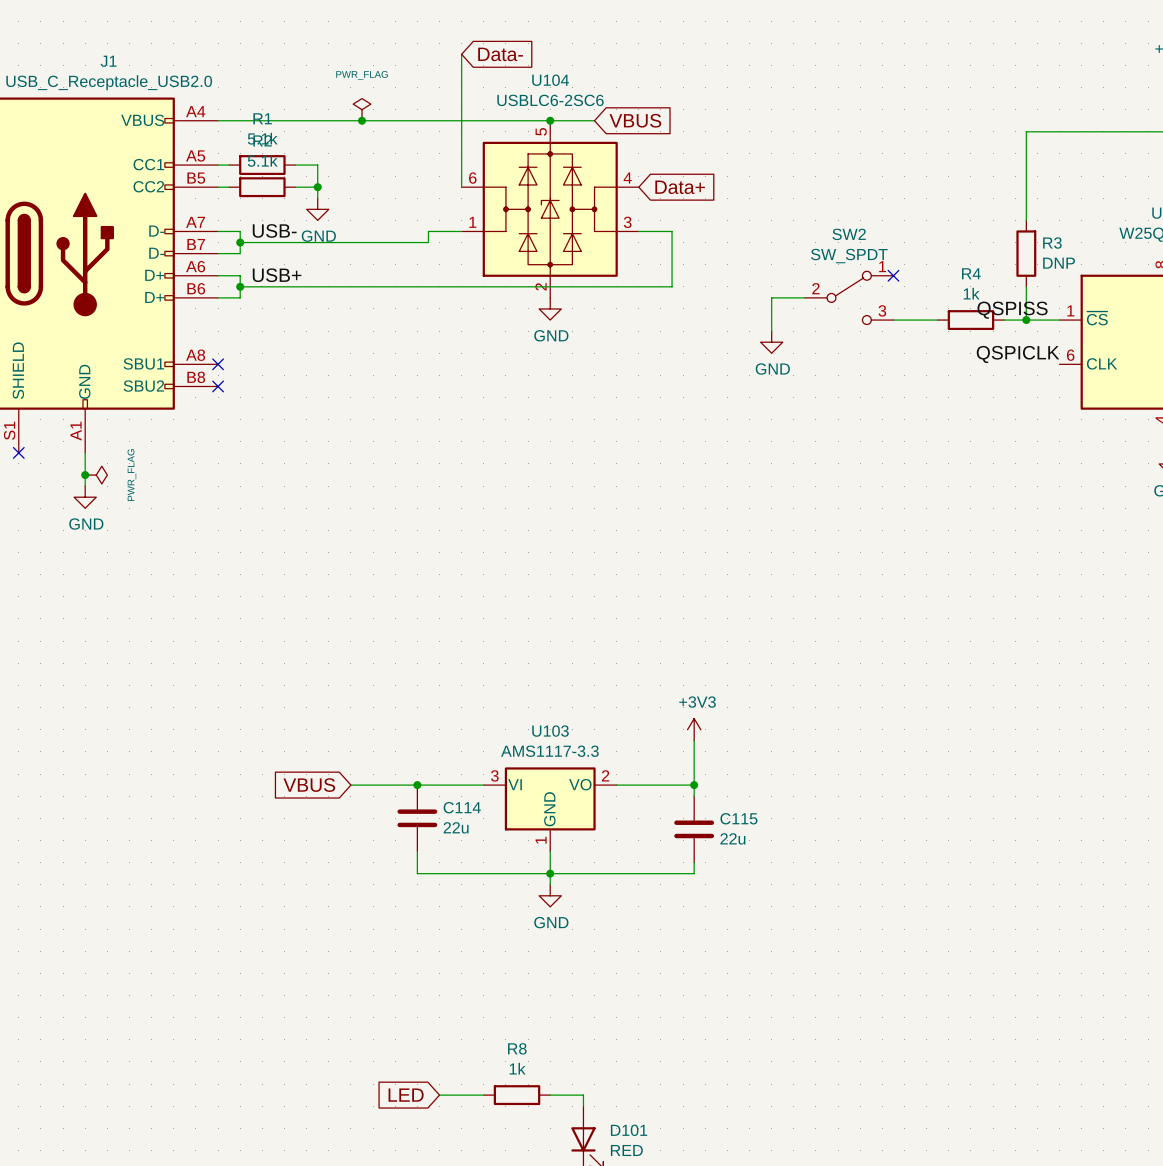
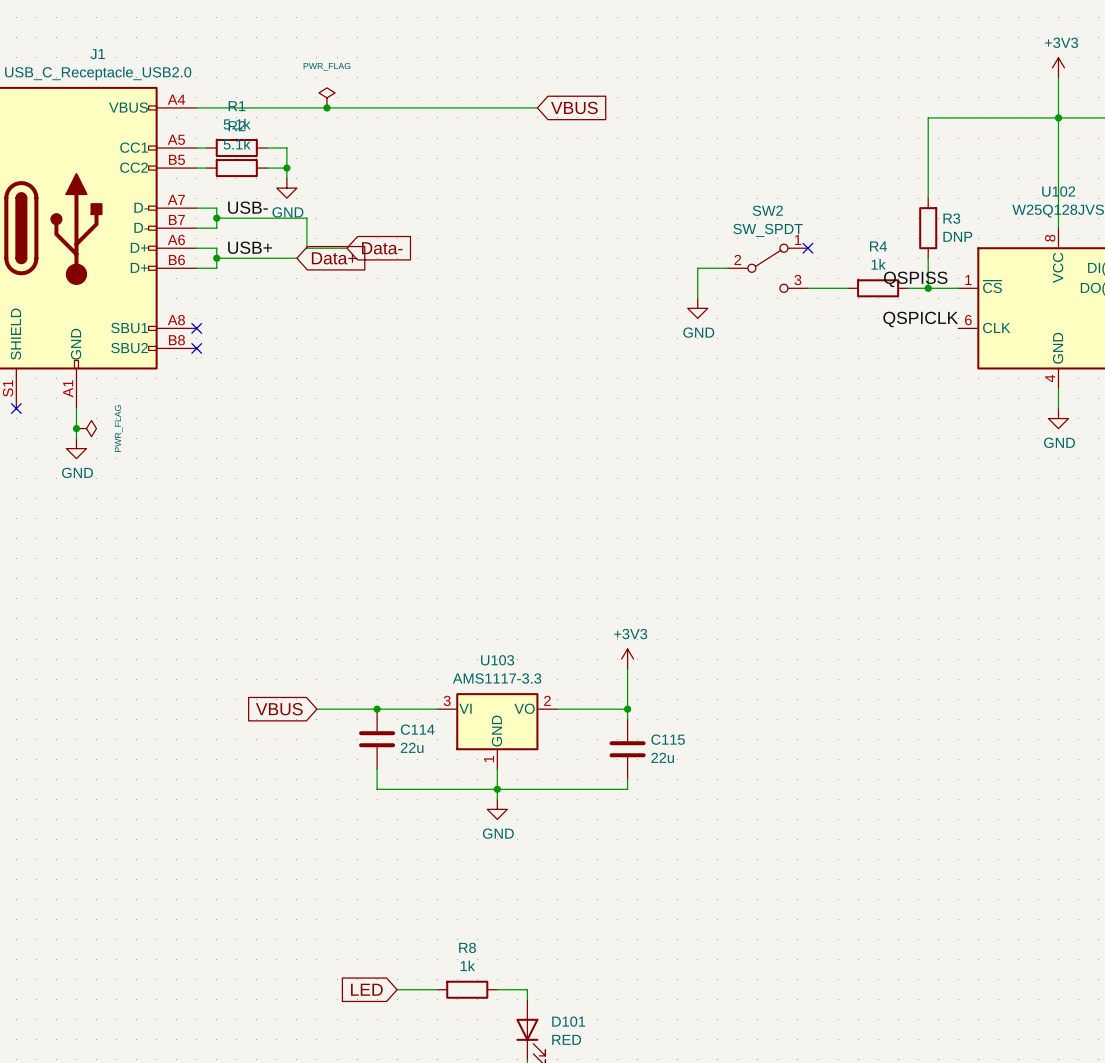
wire: (461, 54) (461, 187) -> none
global label: Data- (500, 54) -> none
junction: (550, 120) -> none
global label: Data+ (680, 187) -> none
U104: USBLC6-2SC6 (550, 209) -> none
wire: (461, 231) (428, 231) (428, 242) (339, 242) -> (347, 248) (306, 248) (306, 218)
wire: (638, 231) (672, 231) (672, 286) (328, 286) -> none
global label: none -> Data- (382, 248)
global label: none -> Data+ (334, 258)
power symbol: GND (550, 308) -> none

